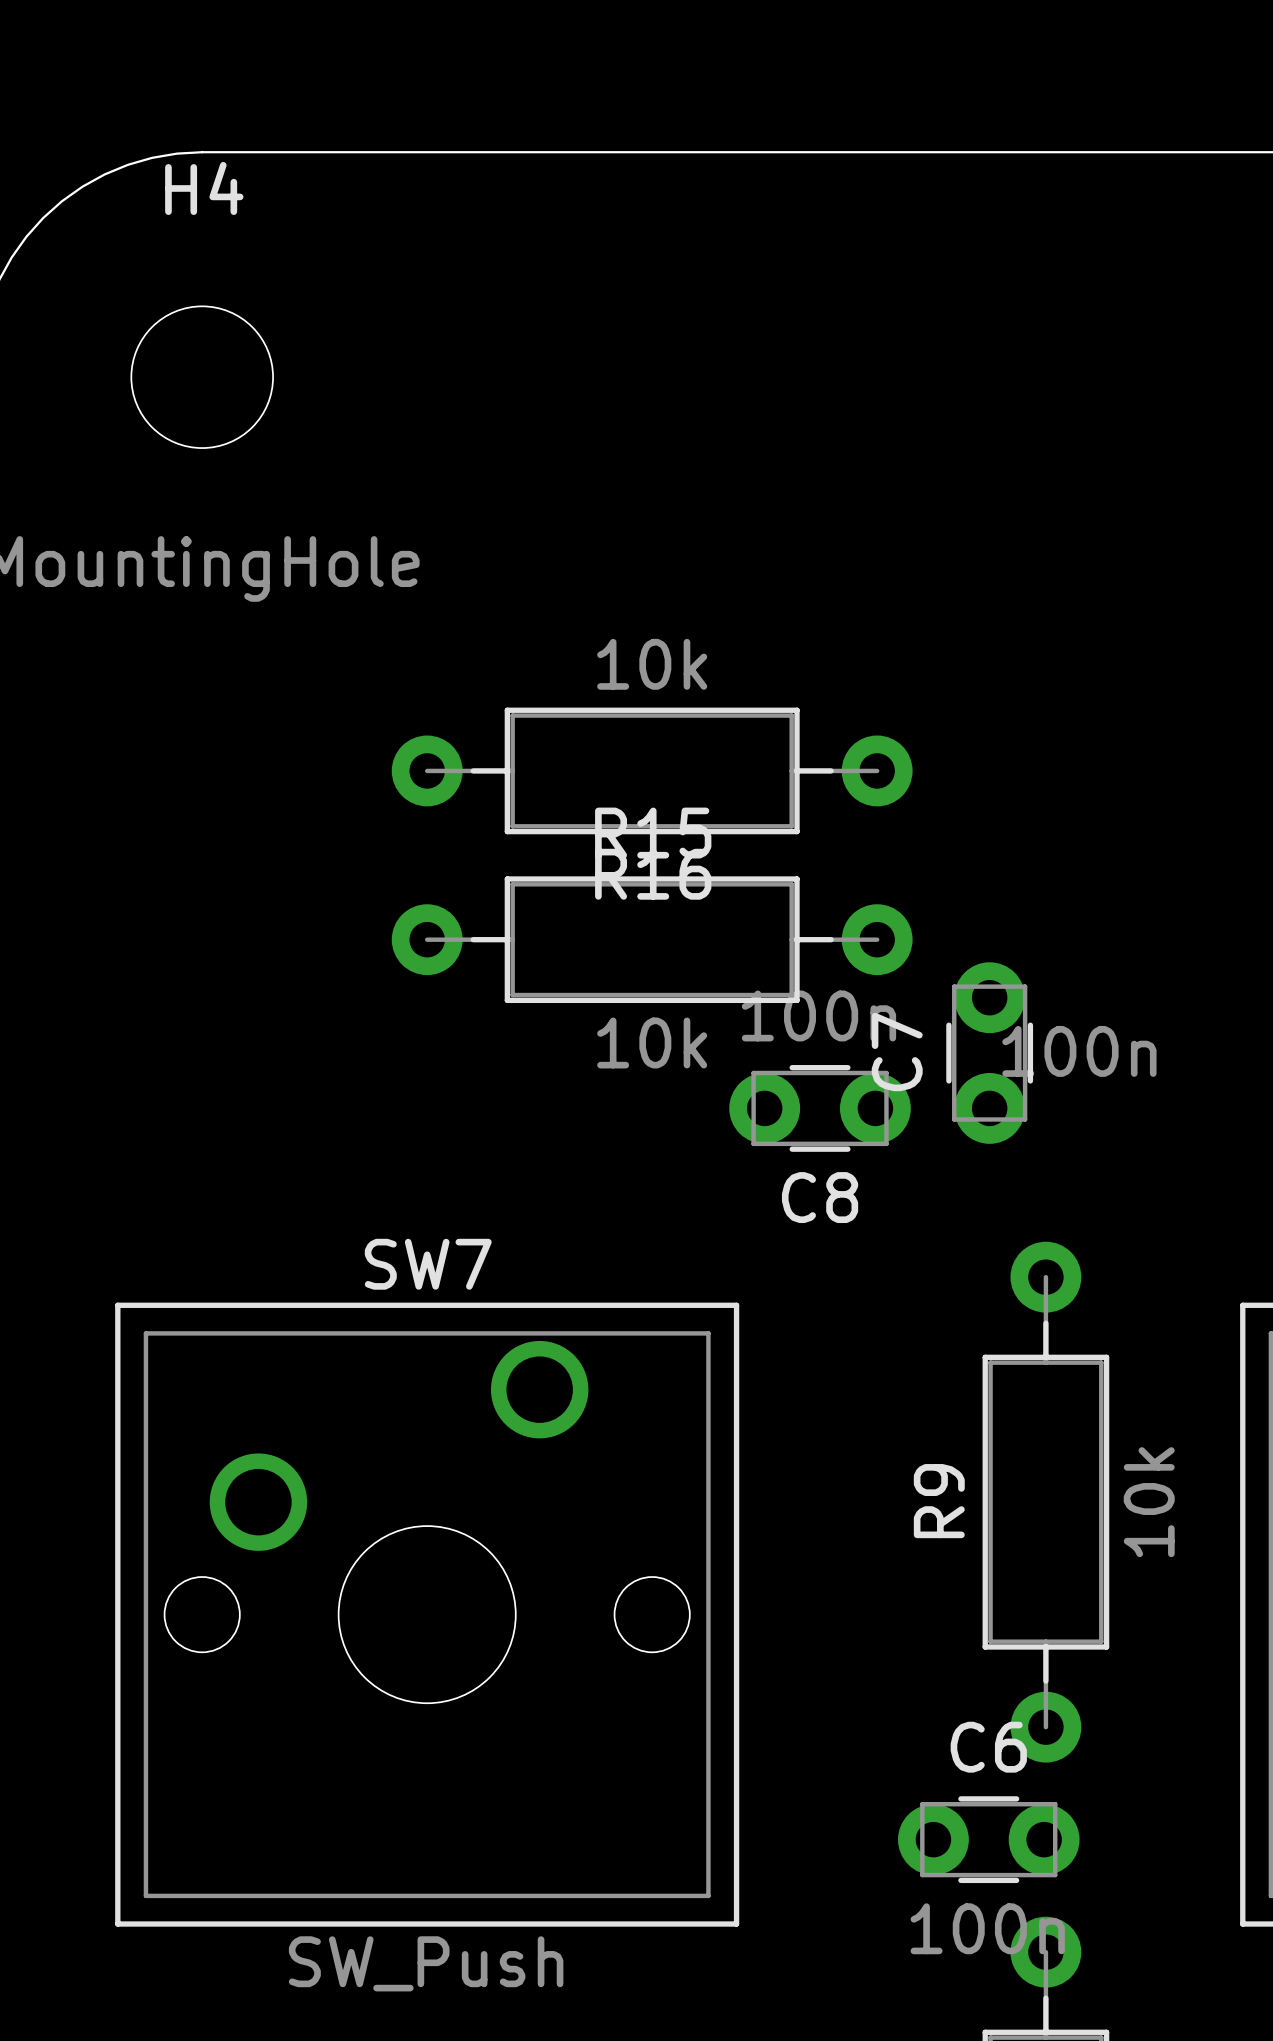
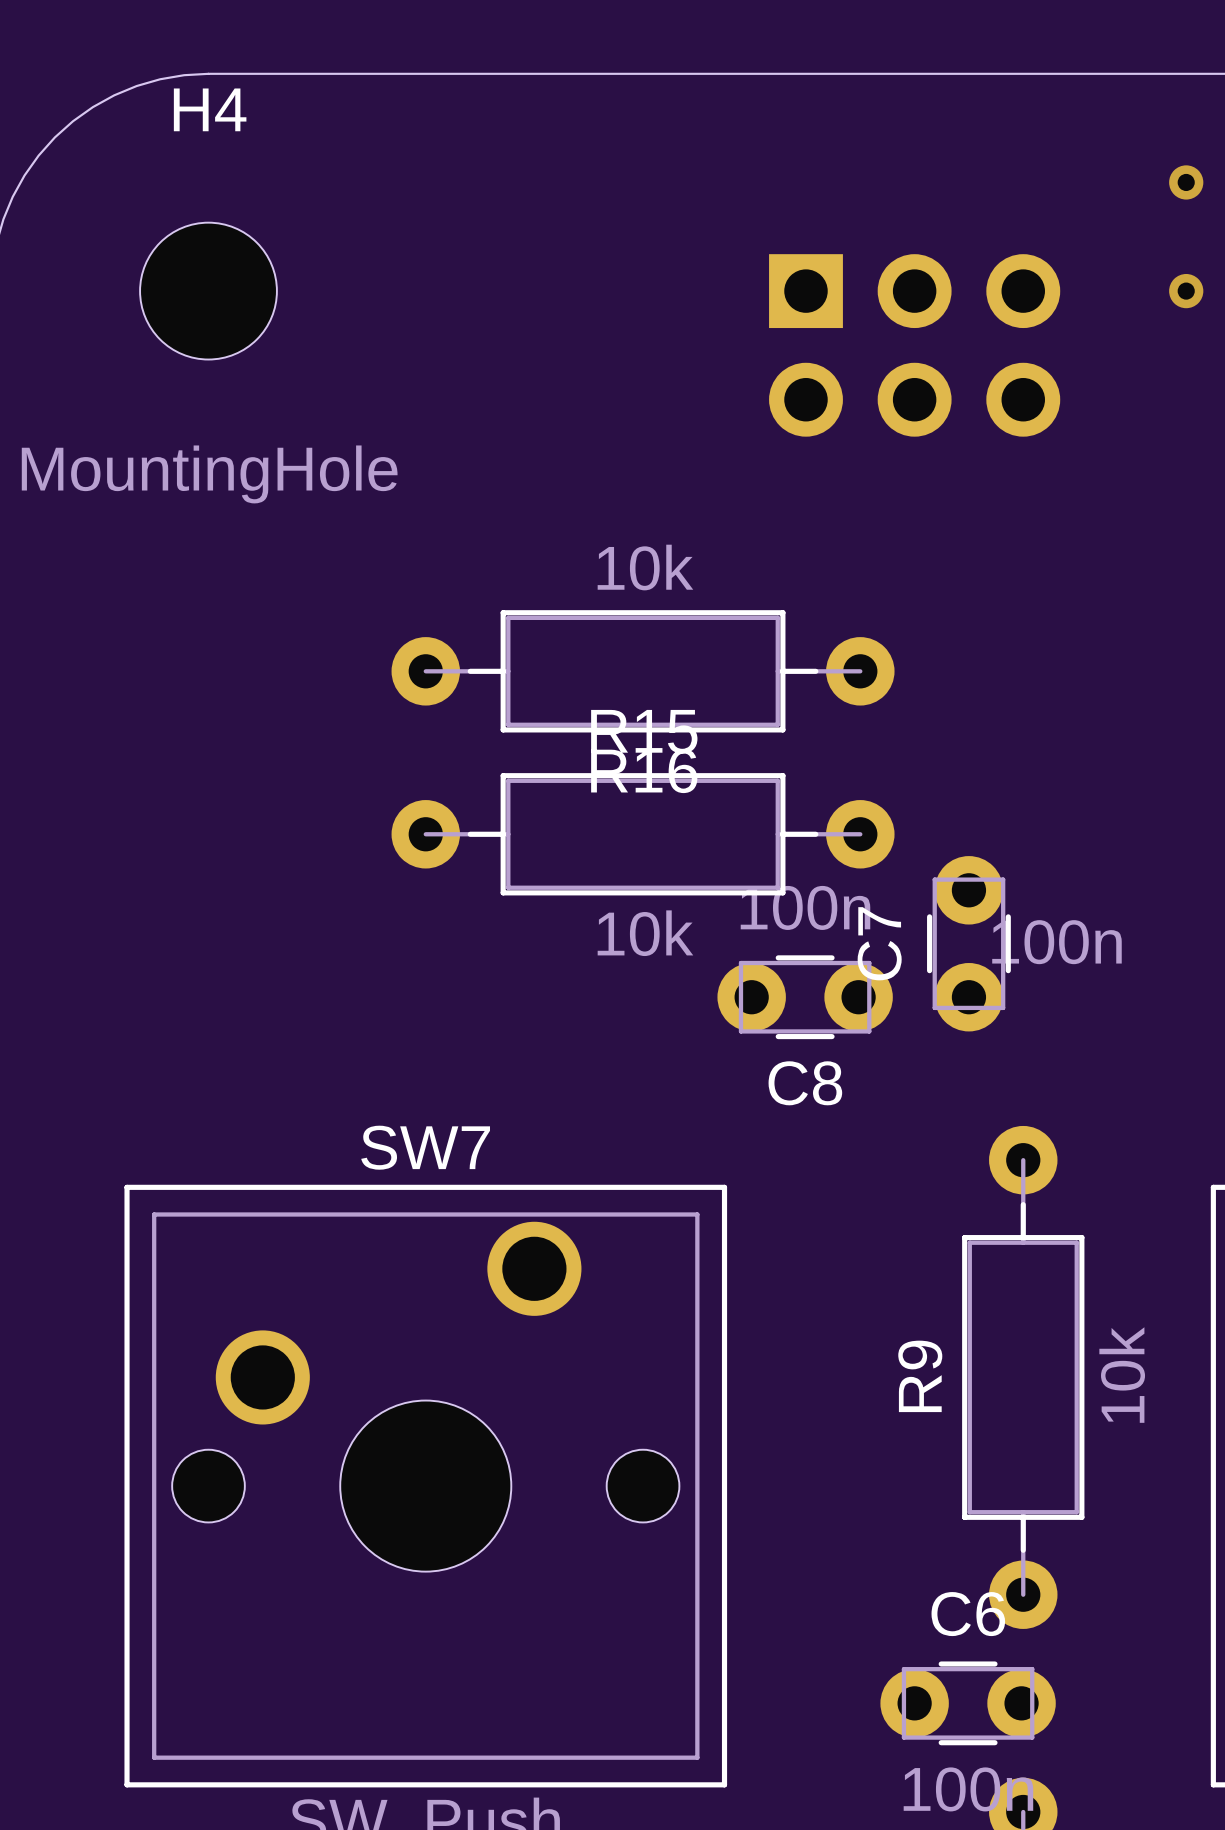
via: none -> (1186, 182)
via: none -> (1186, 291)
part: none -> (914, 345)

